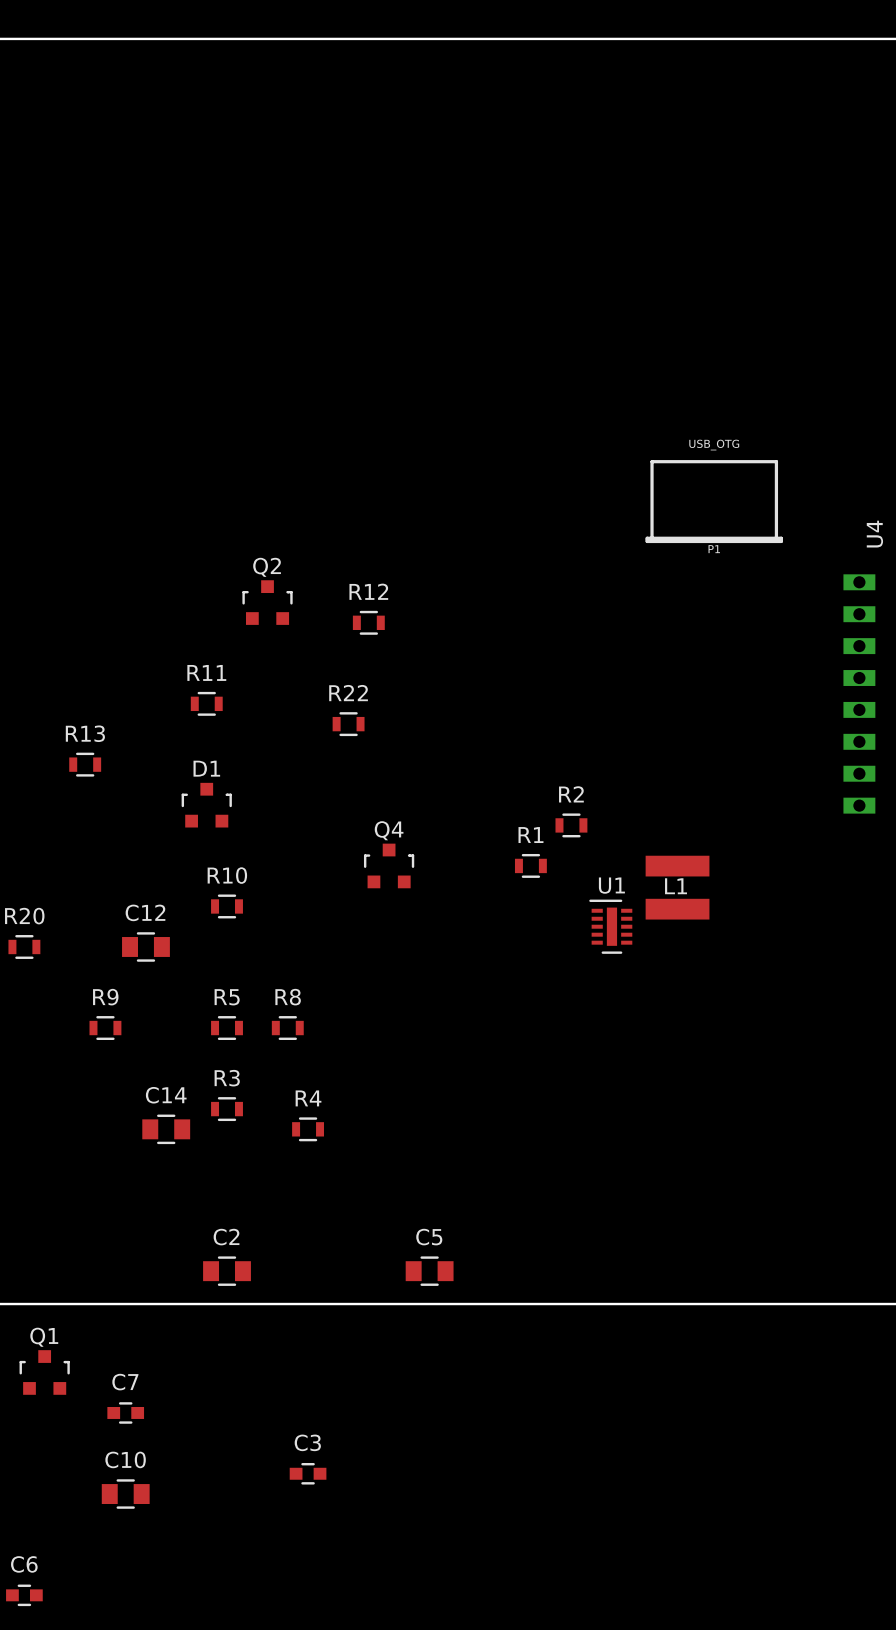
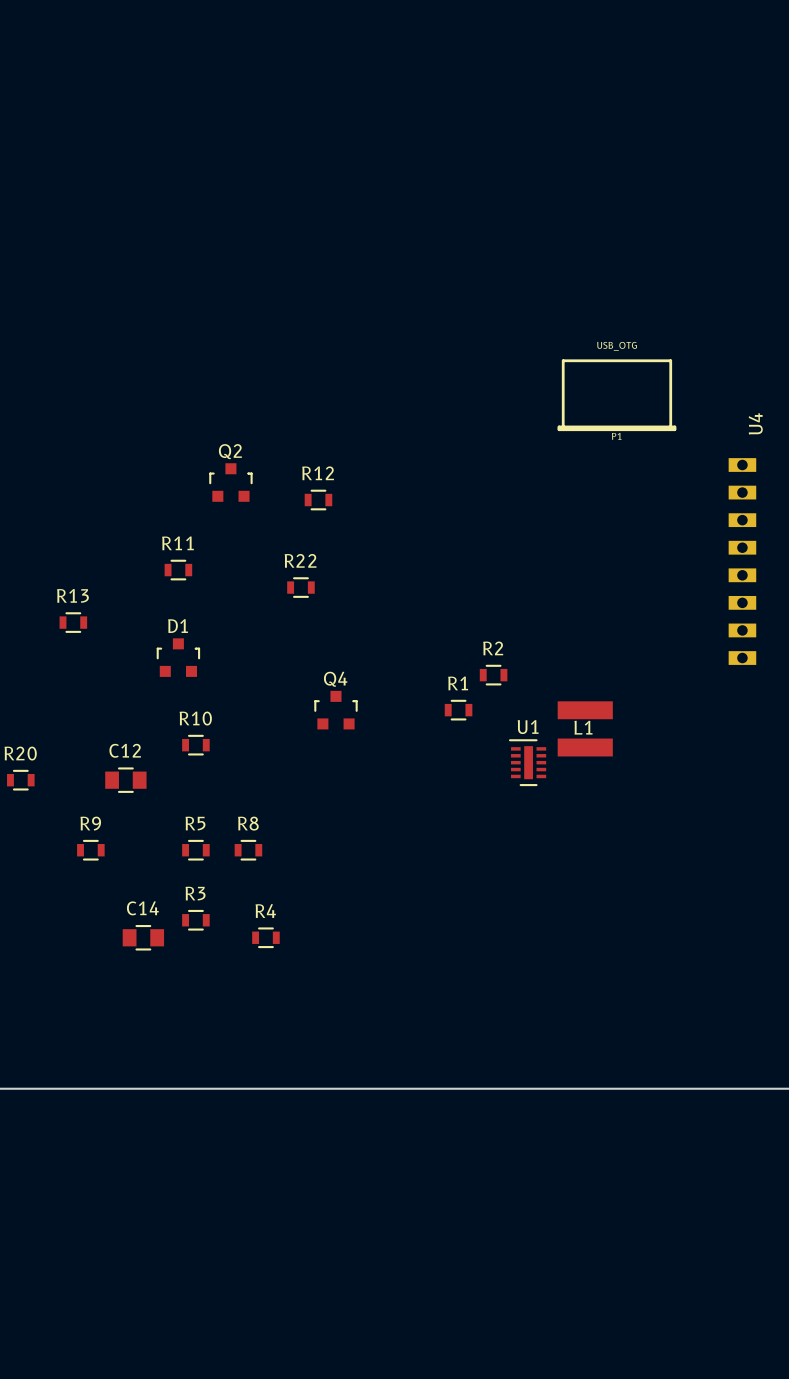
C2: (227, 1271) -> none
C5: (429, 1271) -> none
Q1: (44, 1372) -> none
C7: (125, 1412) -> none
C3: (308, 1473) -> none
C10: (125, 1494) -> none
C6: (24, 1595) -> none

